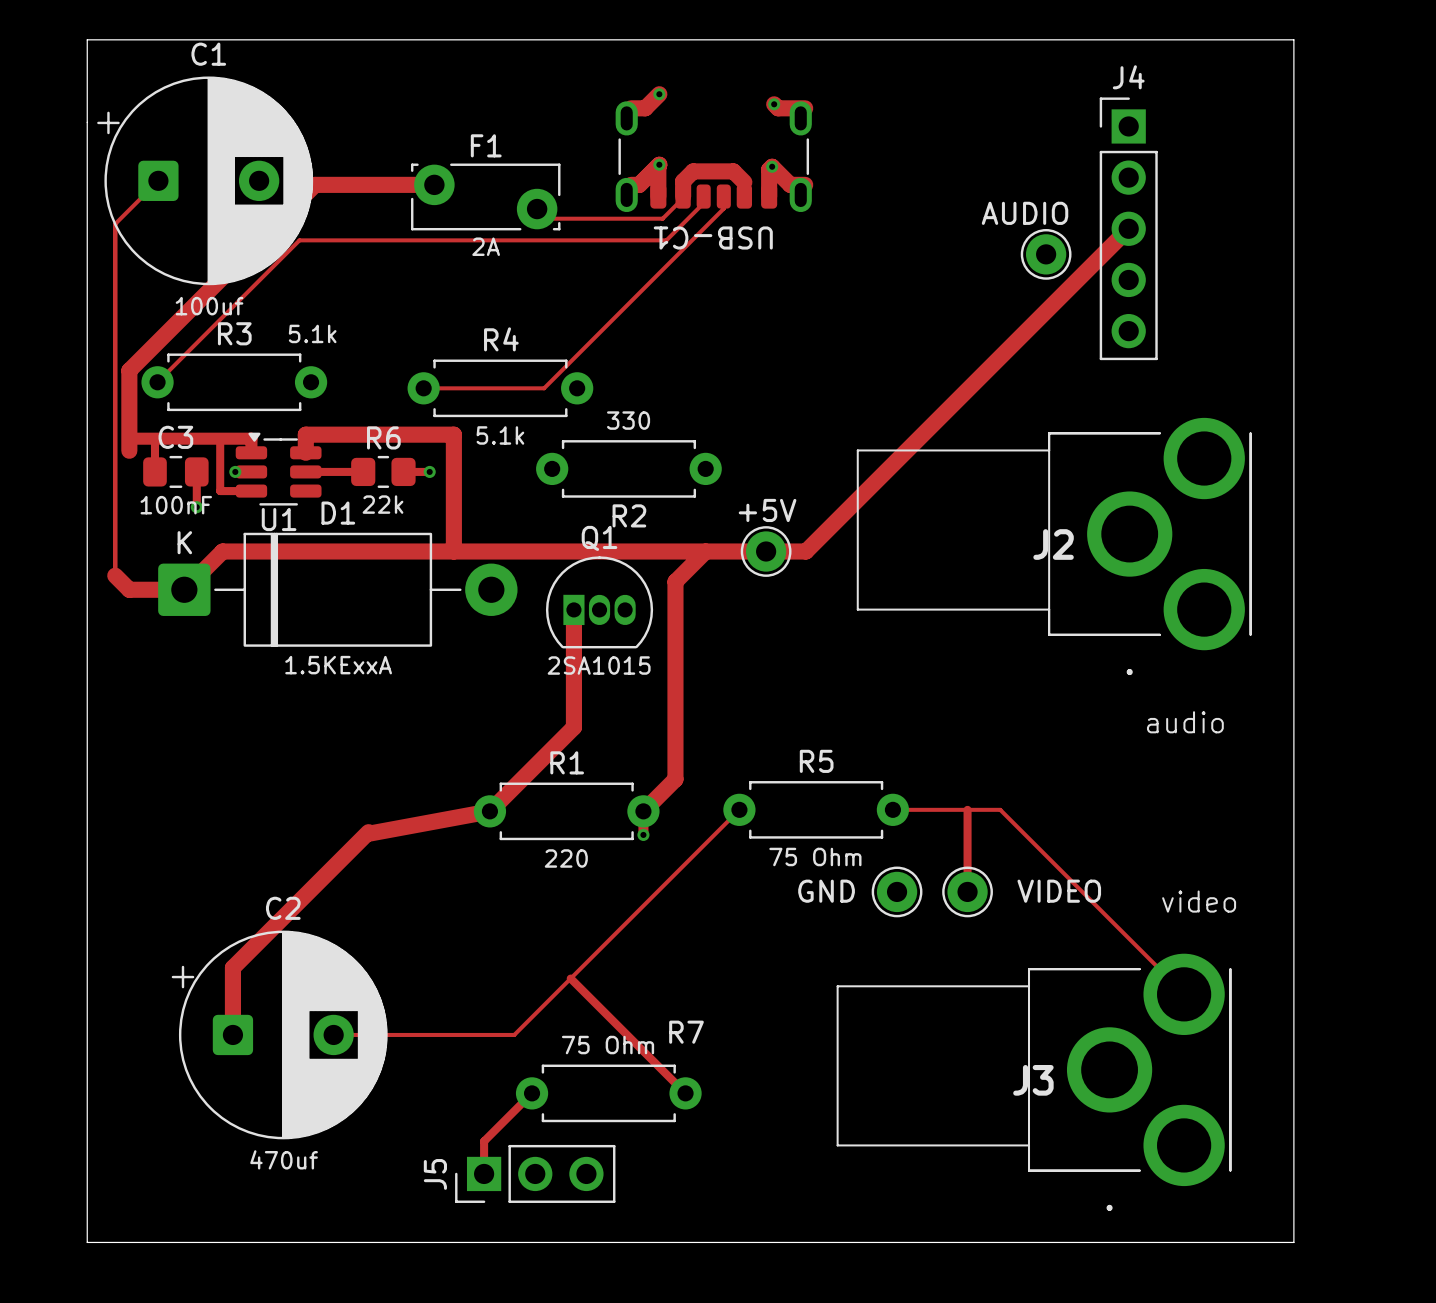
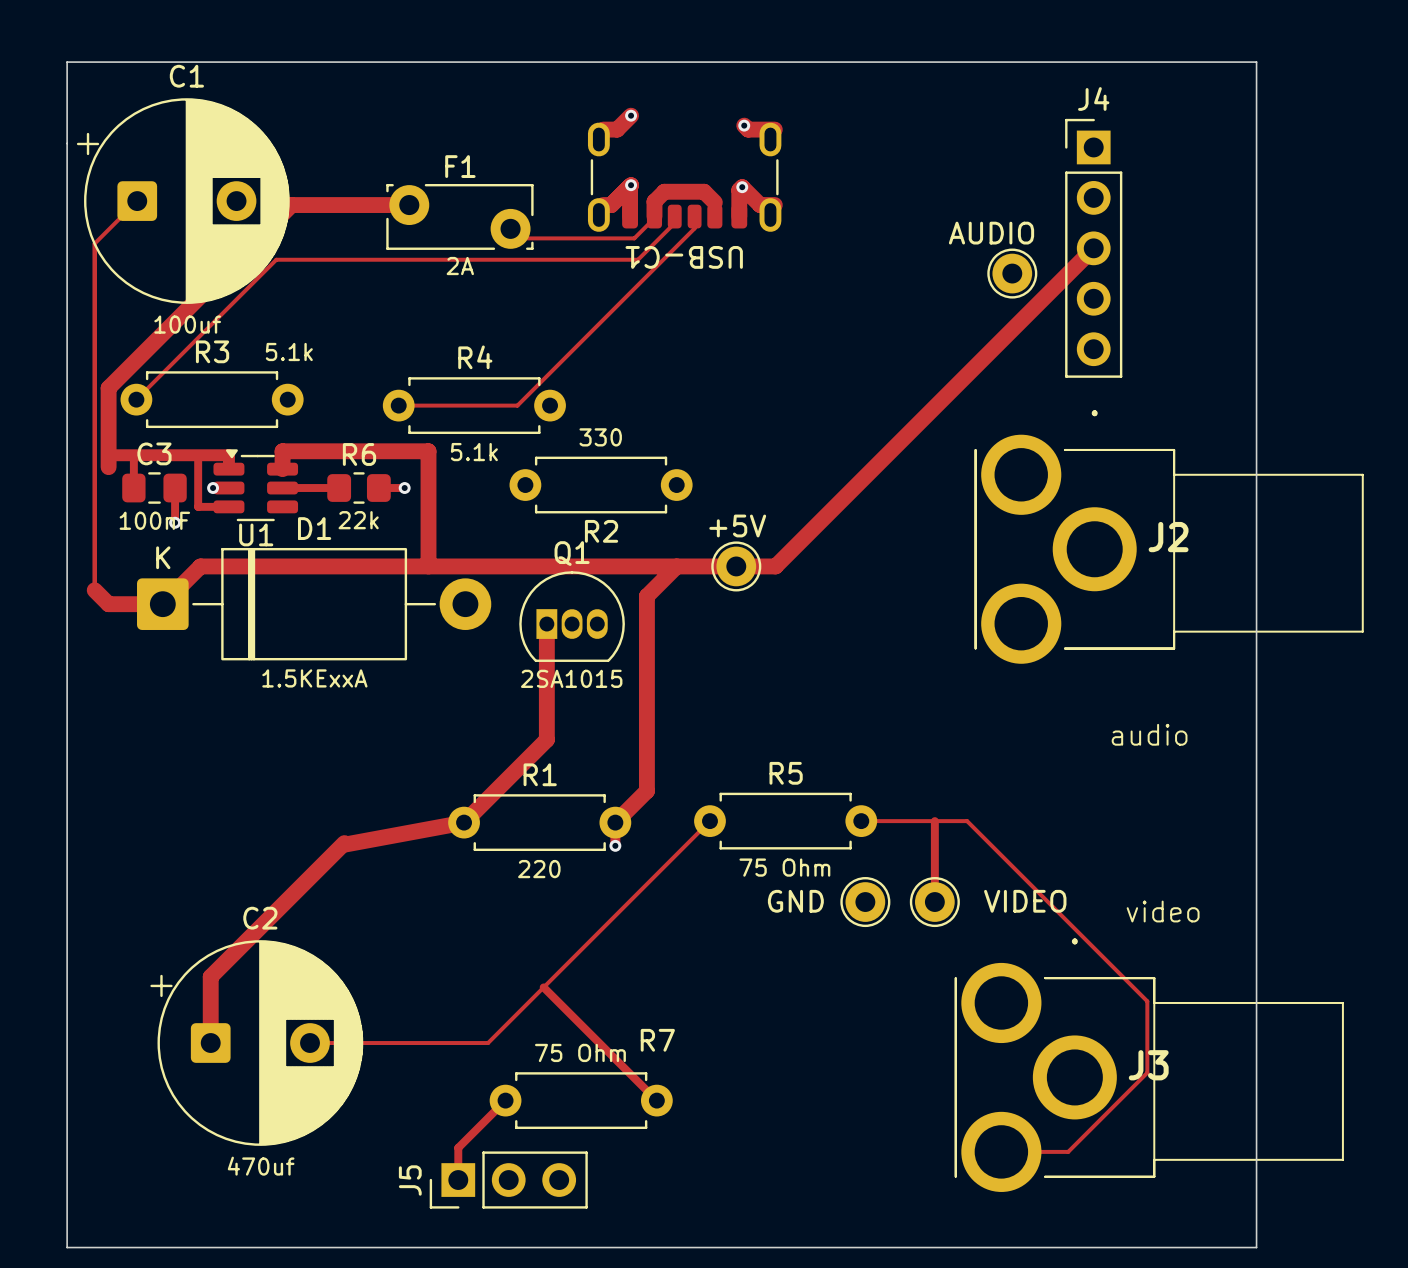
J2 rotation: 0° (1054, 546) -> 180° (1169, 537)
track: none -> (1147, 1001) (1147, 1072) (1068, 1151) (1001, 1151)
J3 rotation: 0° (1034, 1082) -> 180° (1149, 1065)

